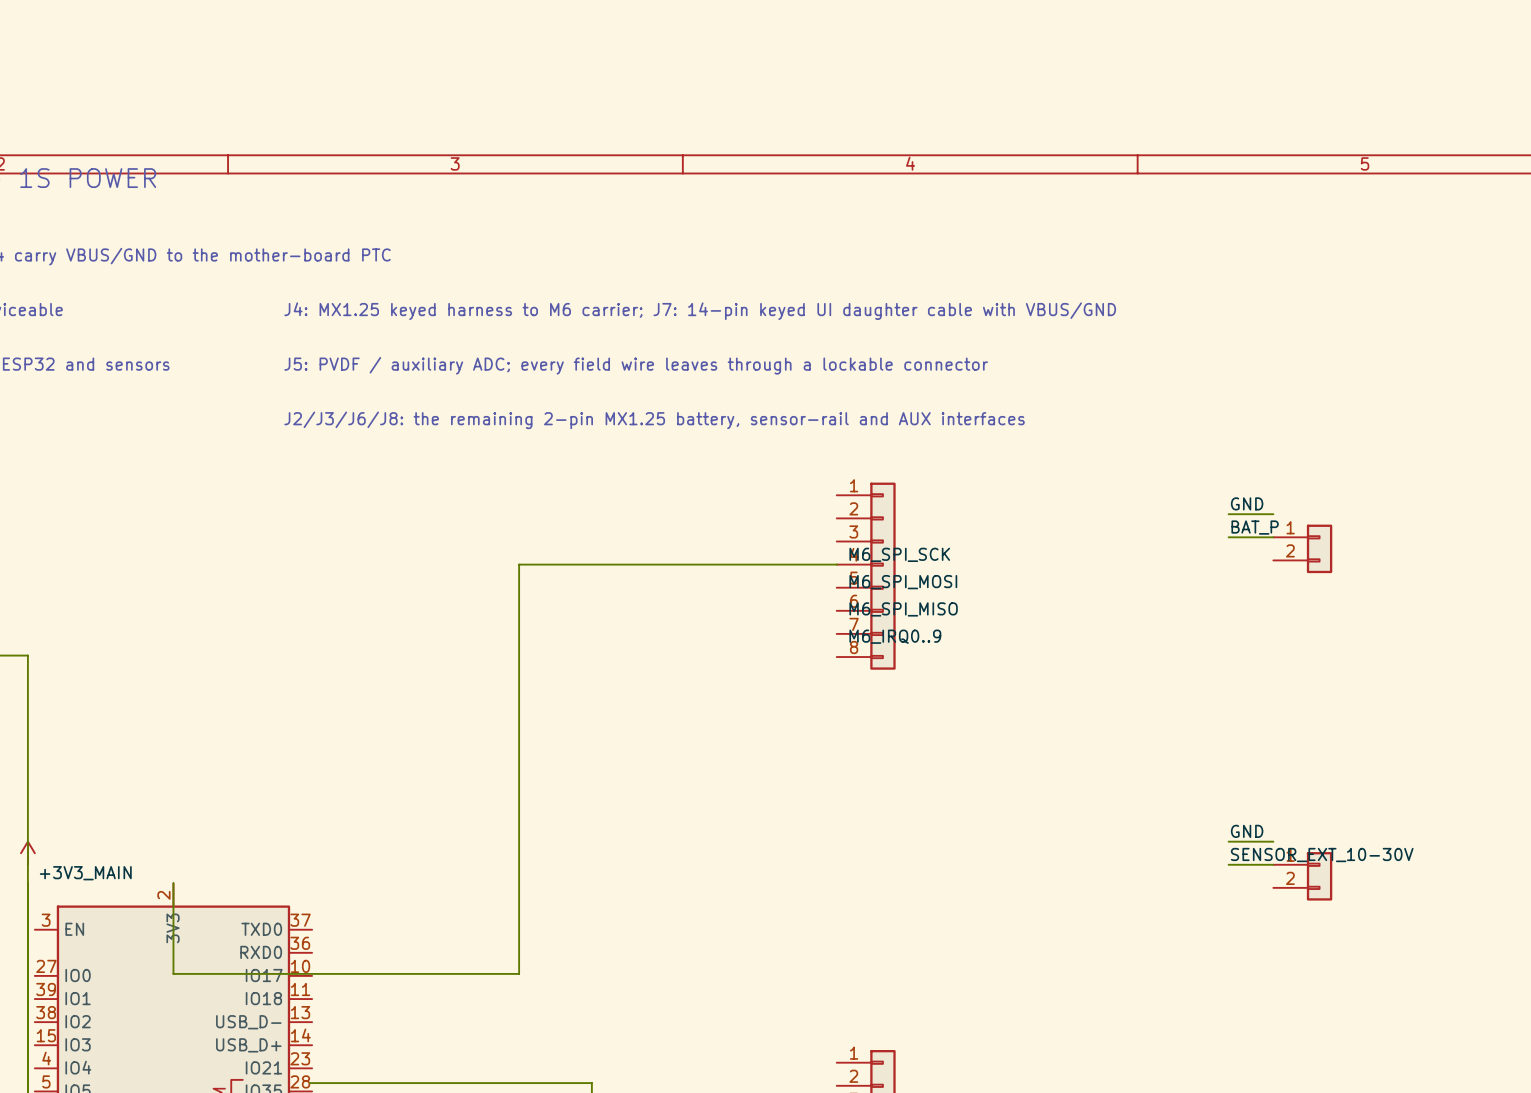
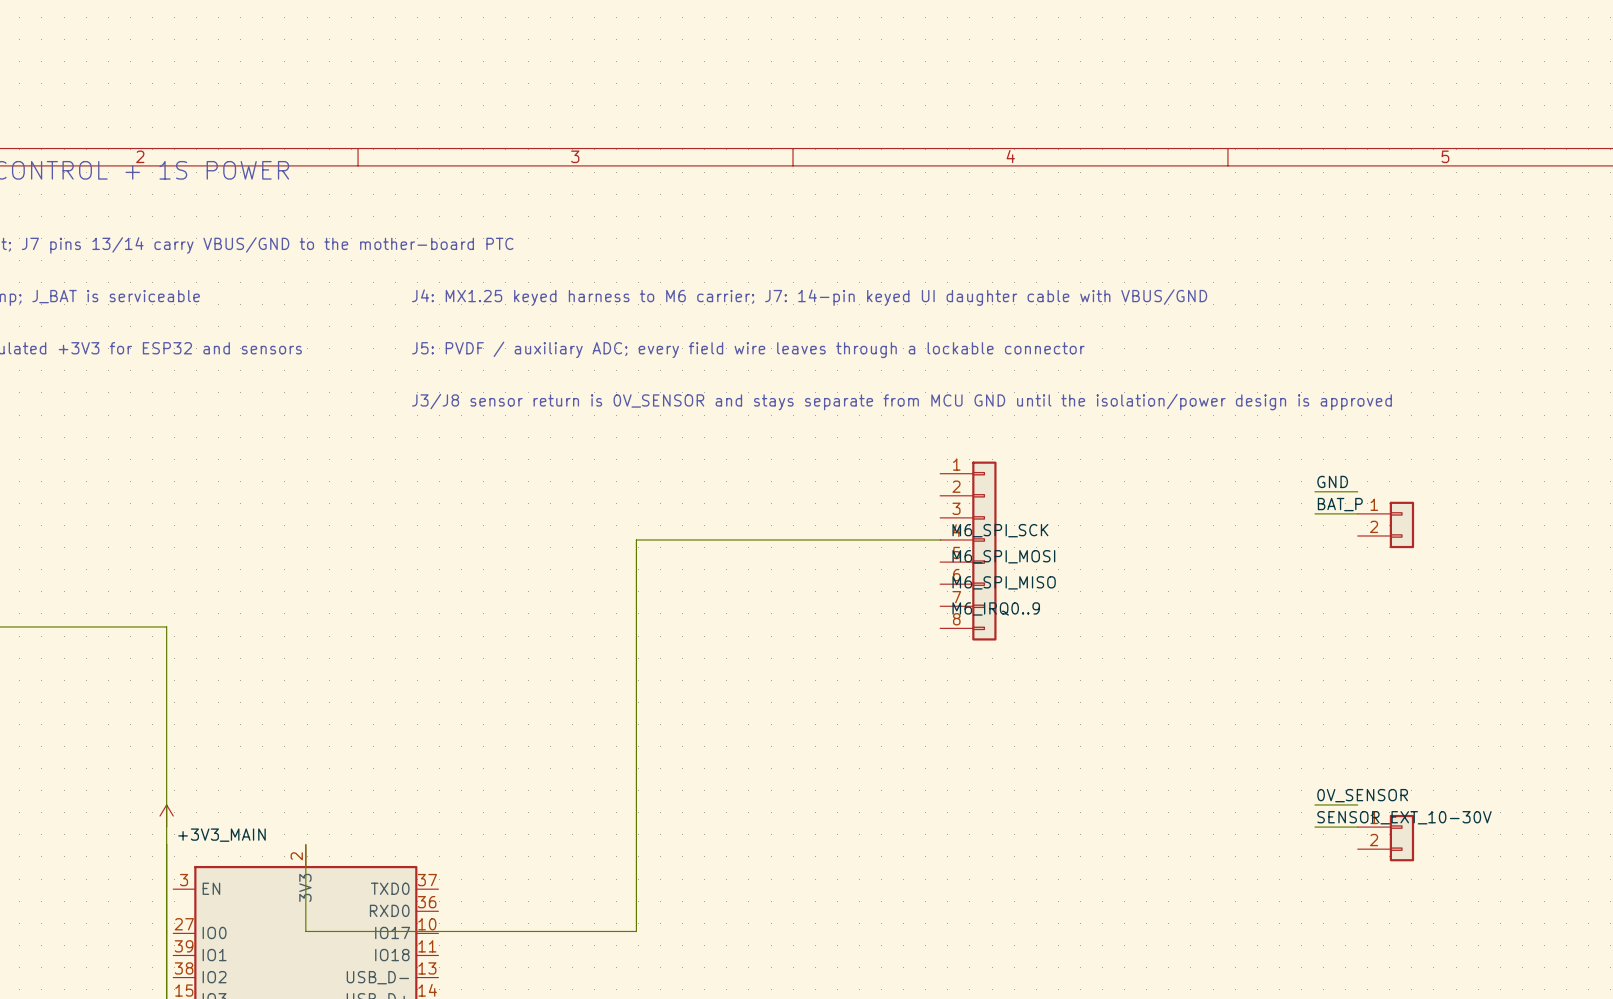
text: J2/J3/J6/J8: the remaining 2-pin MX1.25 battery, sensor-rail and AUX interfaces (654, 420) -> J3/J8 sensor return is 0V_SENSOR and stays separate from MCU GND until the isolation/power design is approved (901, 402)
label: GND (1247, 831) -> 0V_SENSOR (1362, 795)

